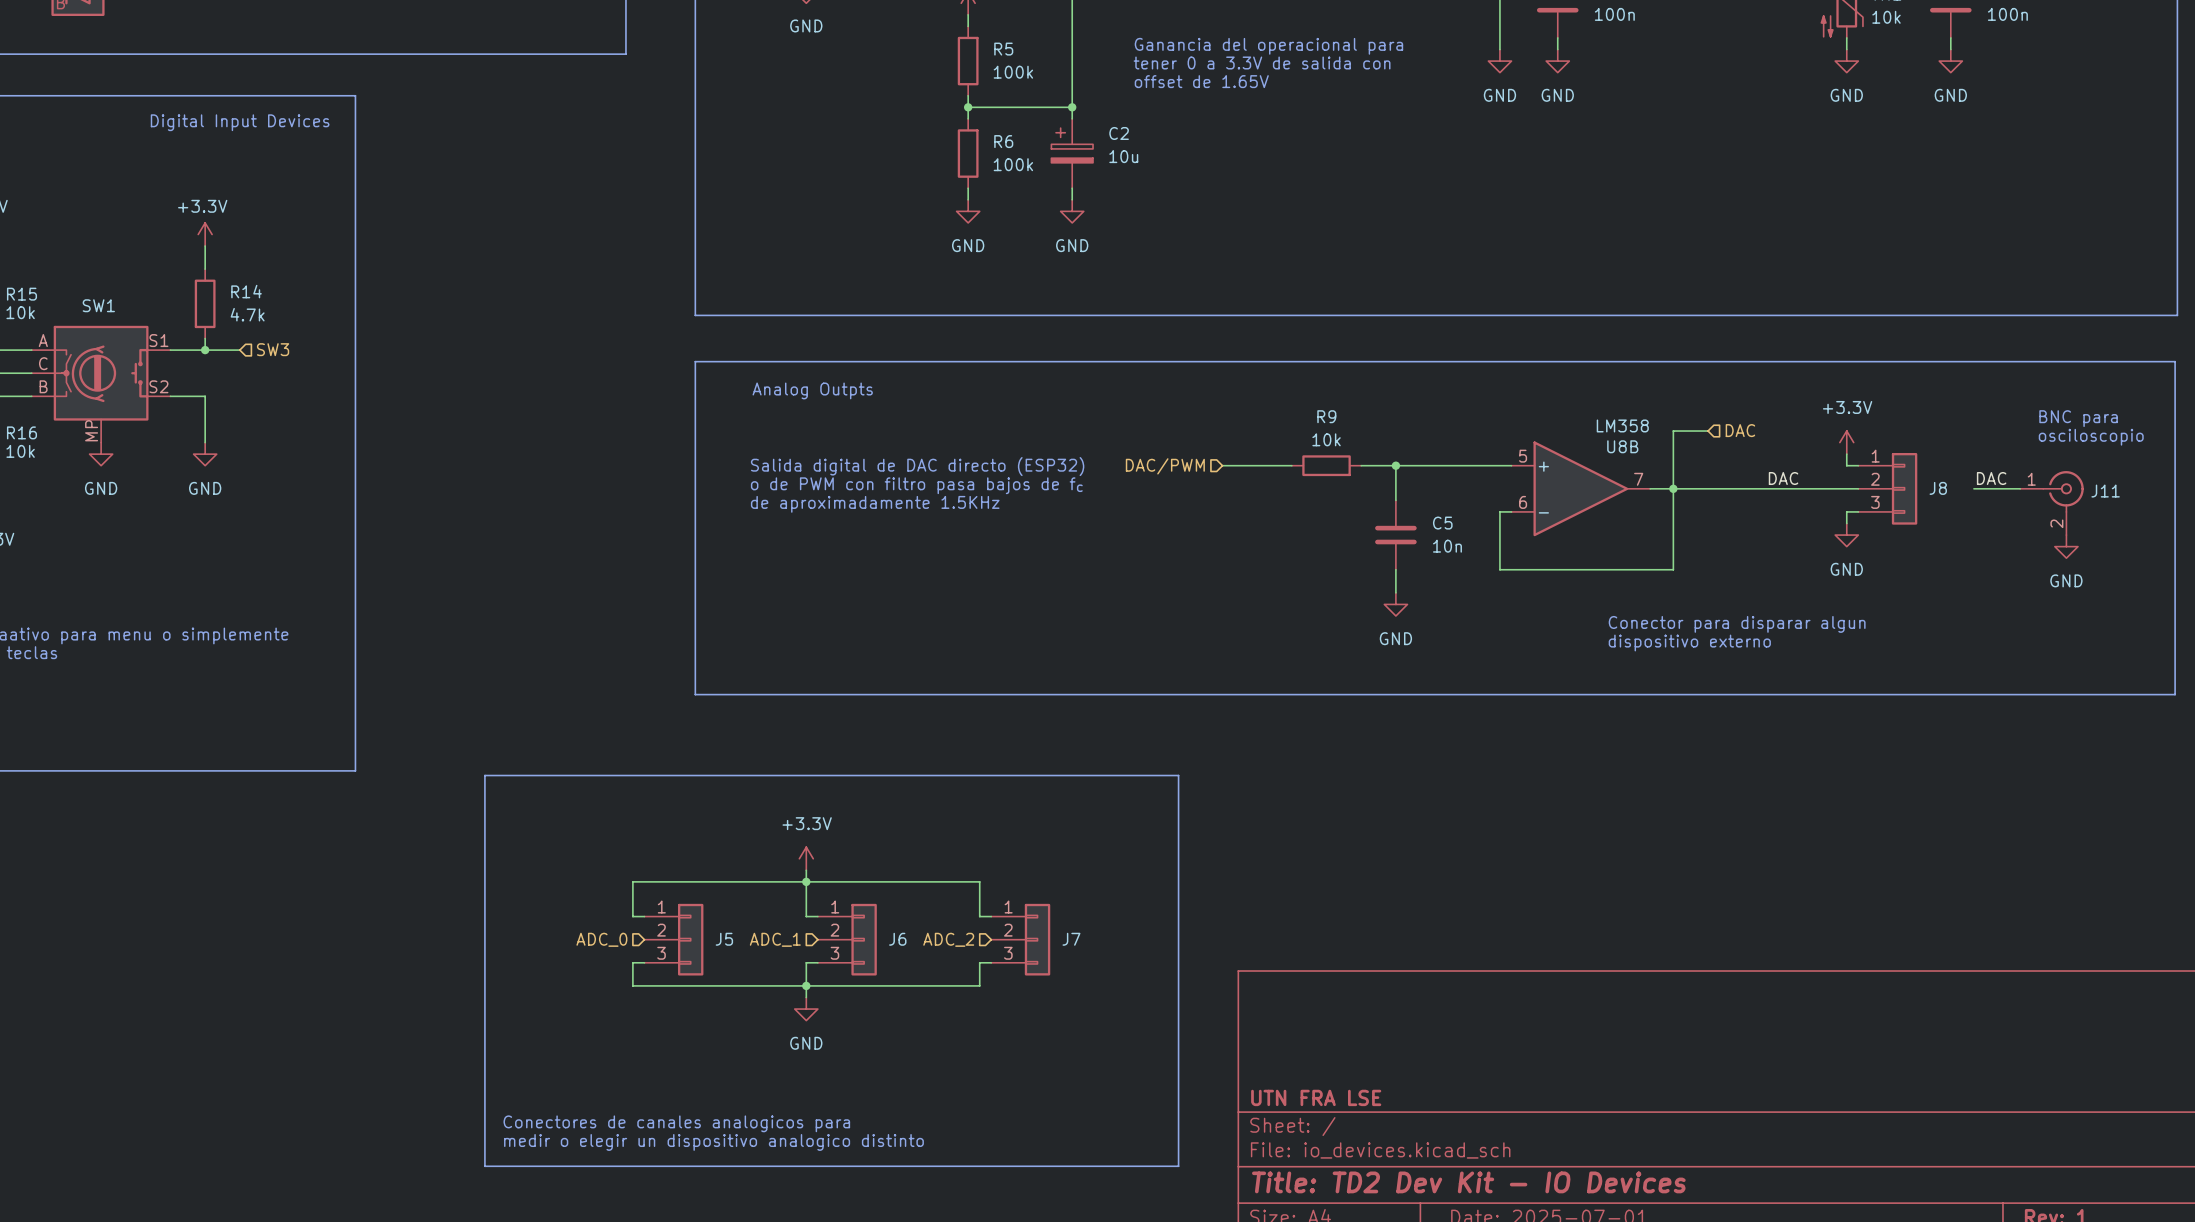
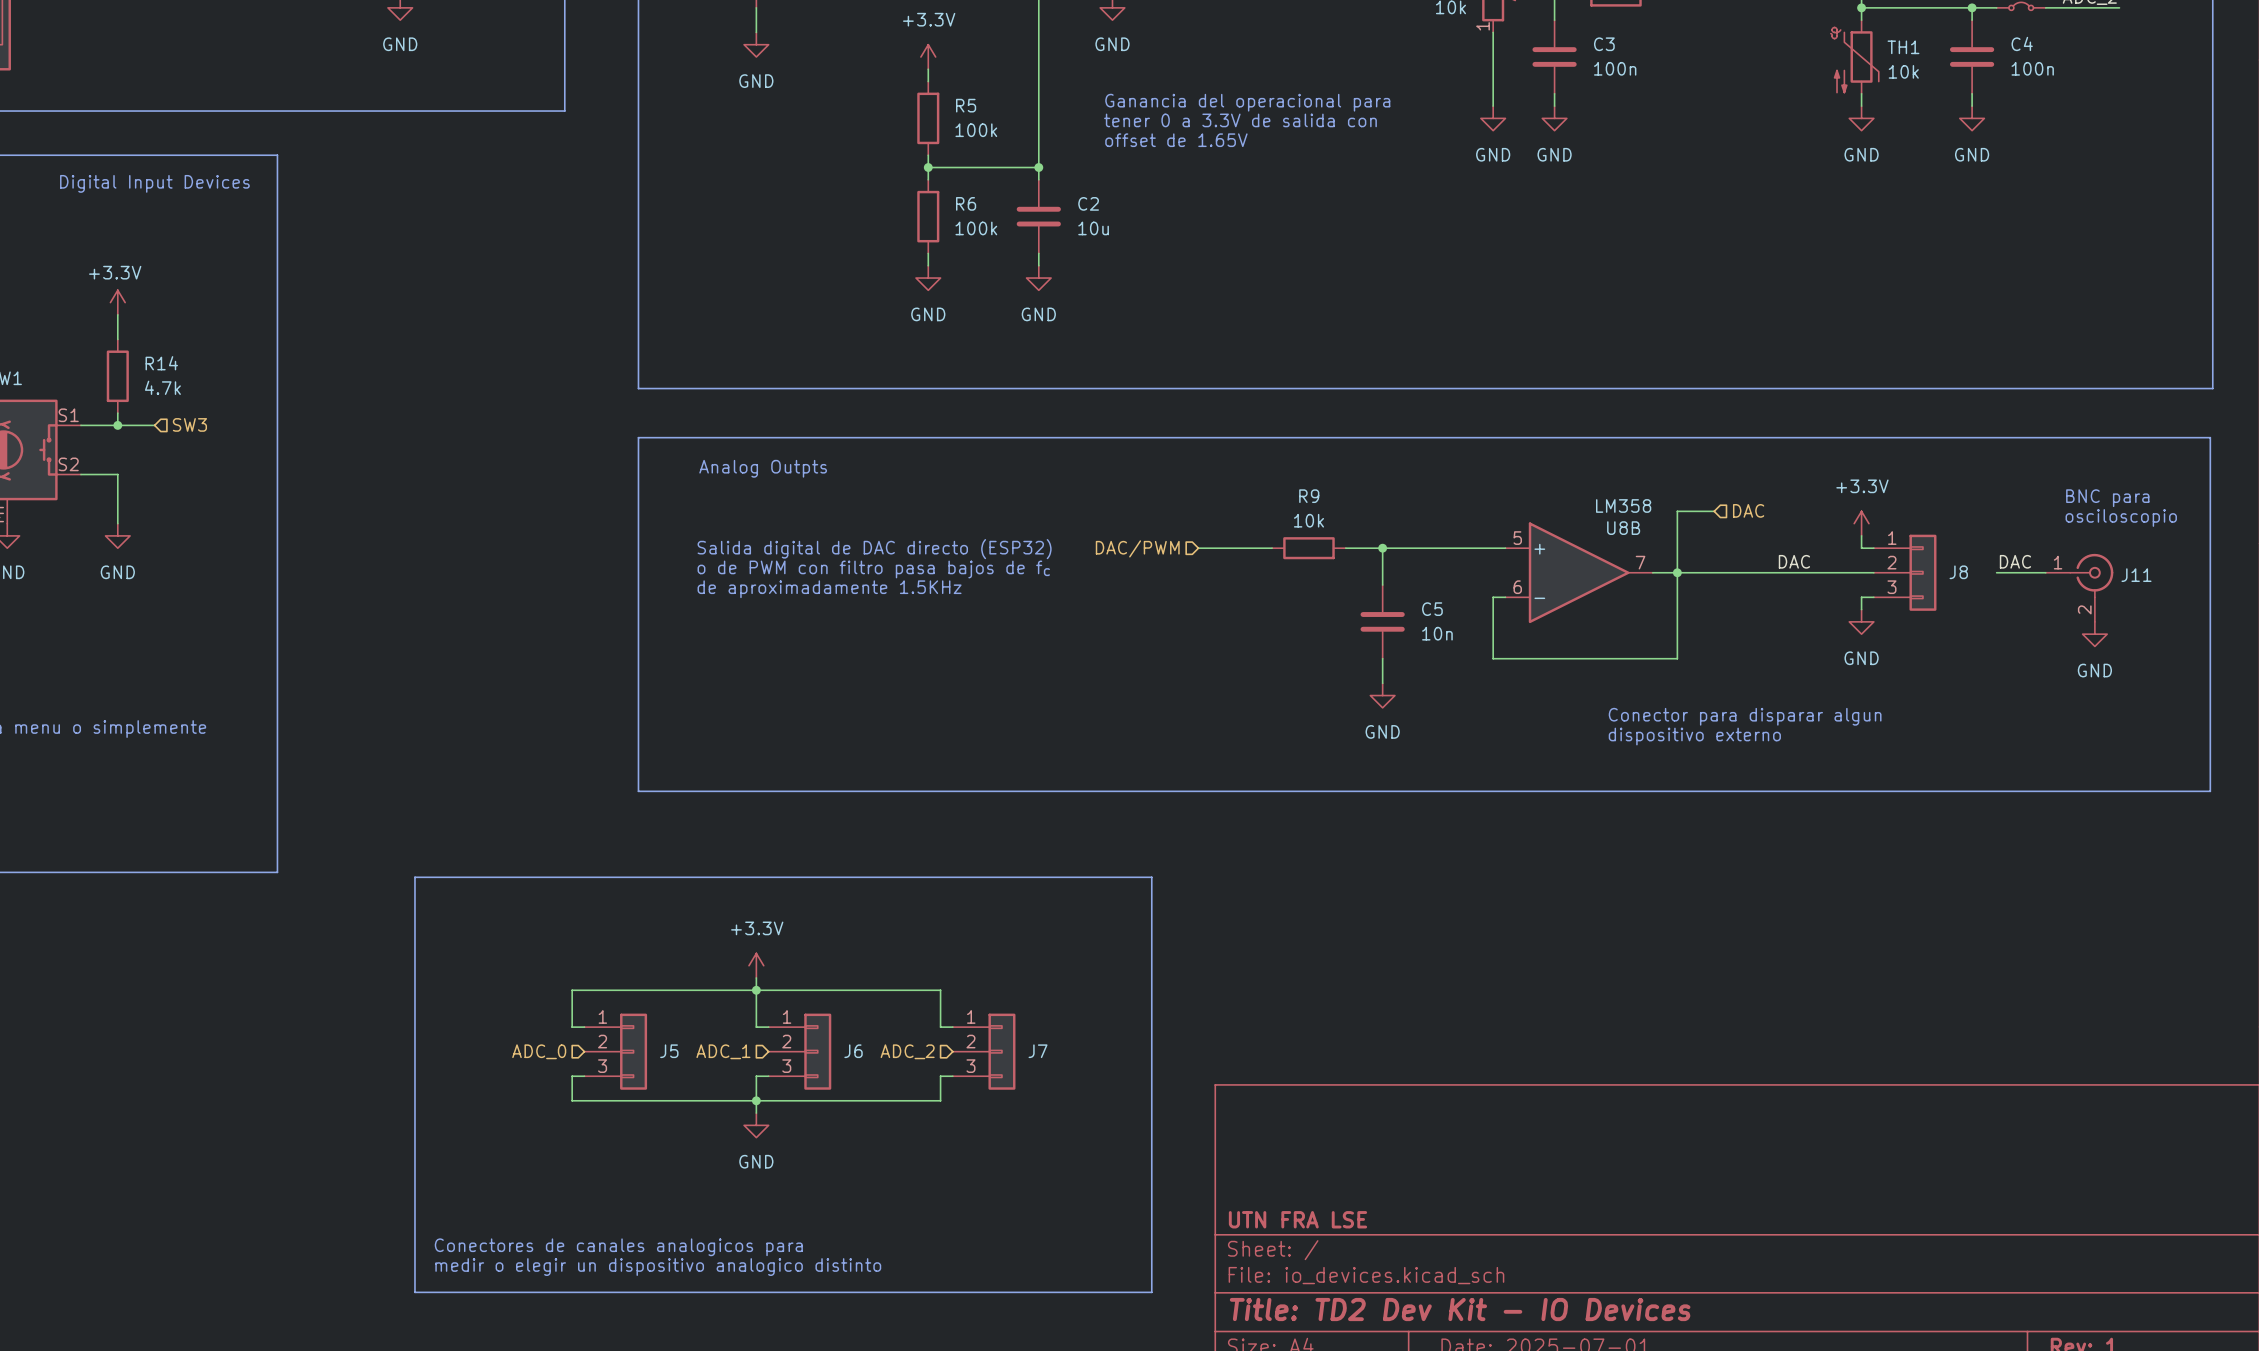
C2 symbol: [1051, 118, 1094, 189] -> [1016, 179, 1061, 254]

